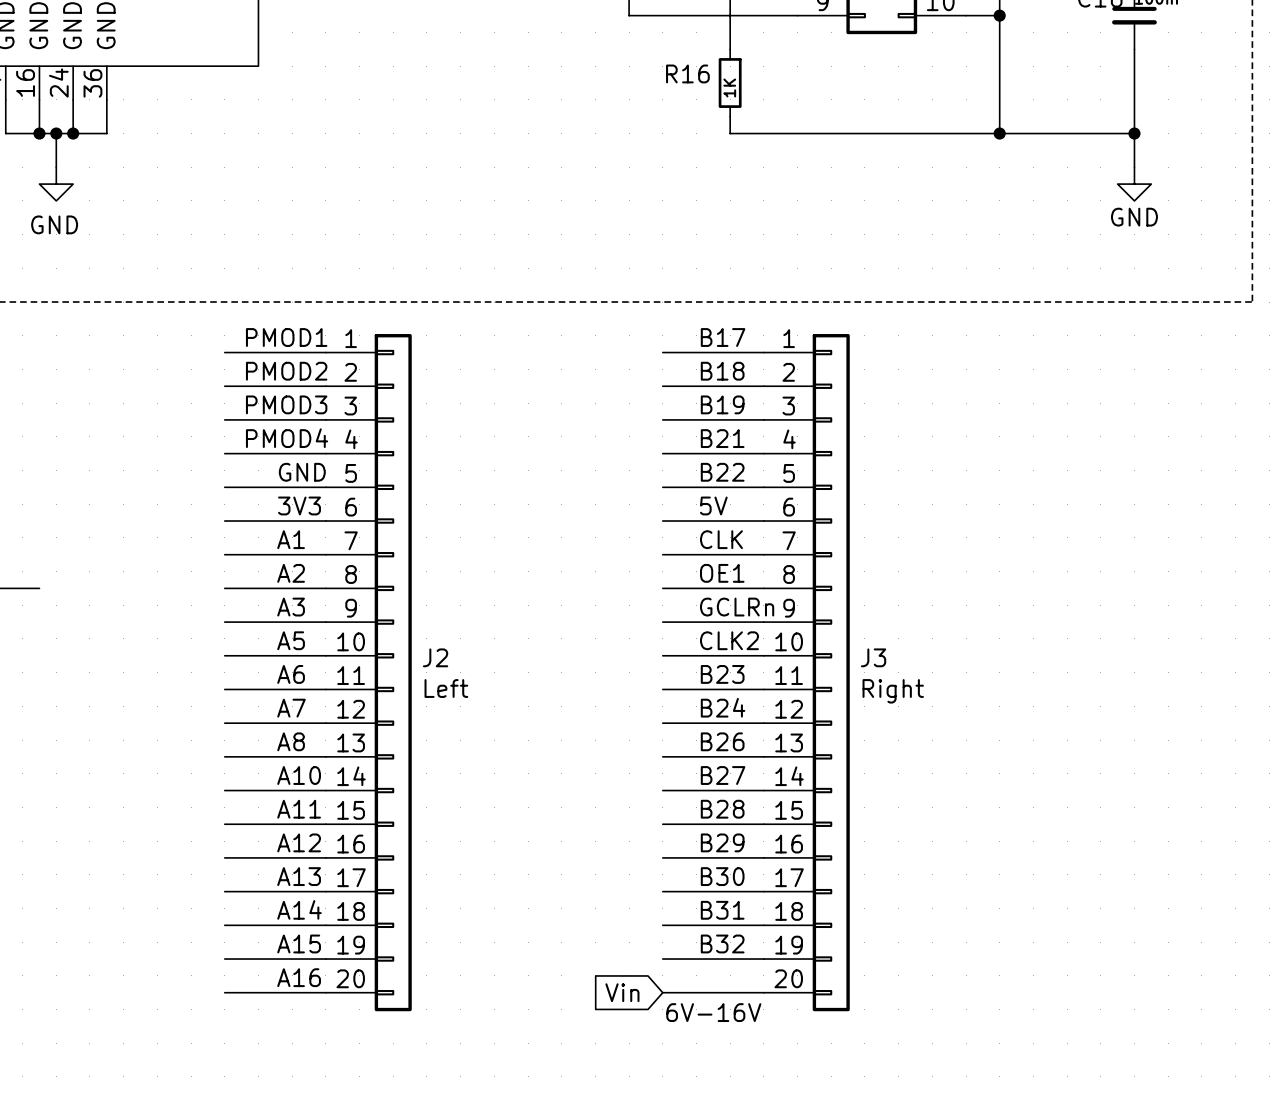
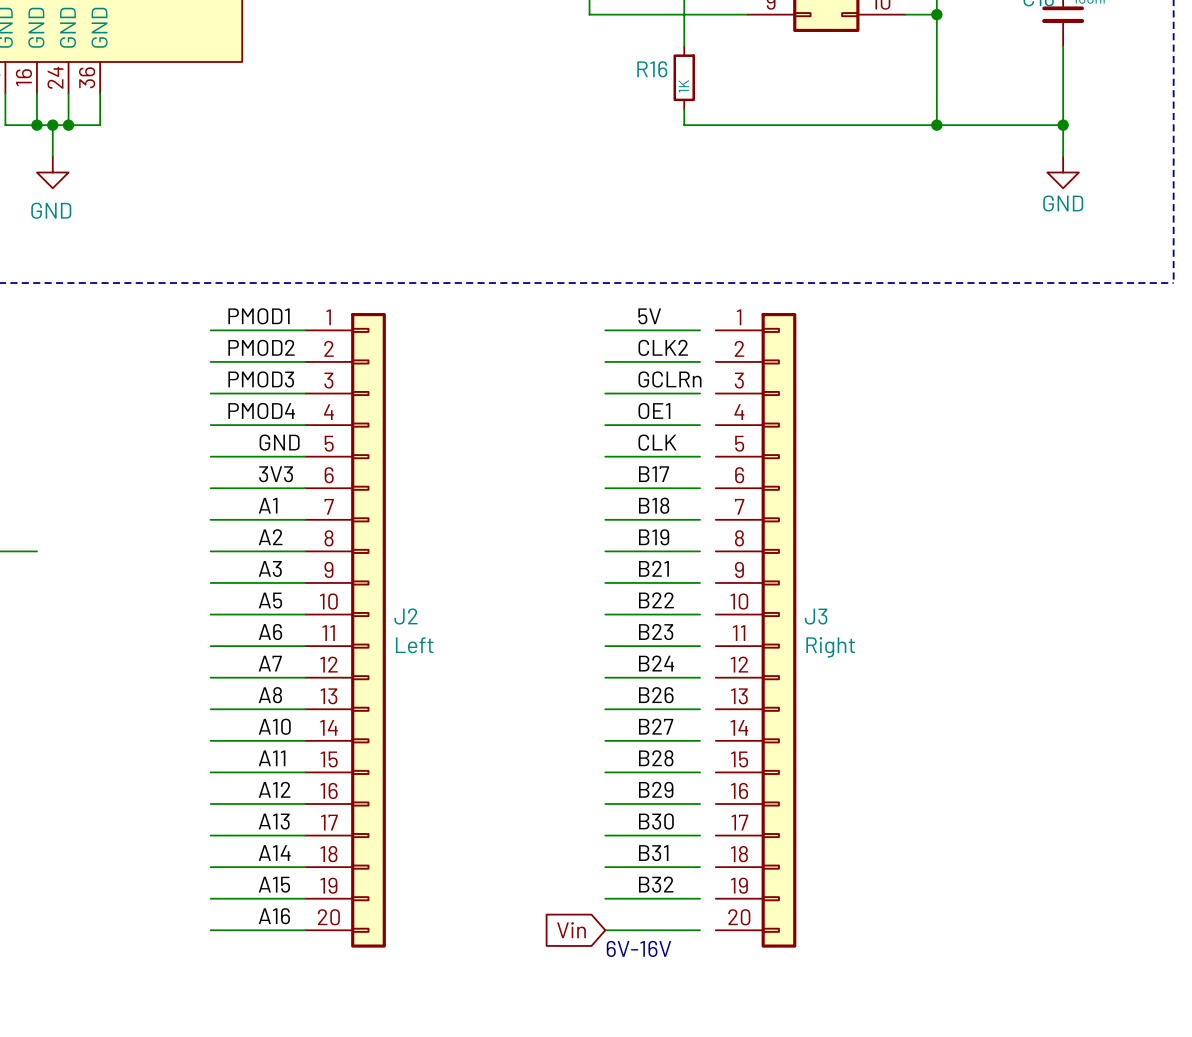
label position: B17 (723, 337) -> B17 (654, 474)
wire: (747, 352) (763, 352) -> (605, 330) (621, 330)
label position: B18 (722, 371) -> B18 (654, 505)
wire: (747, 386) (763, 386) -> (605, 361) (621, 361)
label position: B19 (722, 404) -> B19 (654, 537)
wire: (747, 419) (763, 419) -> (605, 393) (621, 393)
label position: B21 (722, 438) -> B21 (653, 568)
wire: (747, 453) (763, 453) -> (605, 425) (621, 425)
label position: B22 (722, 472) -> B22 (656, 600)
wire: (747, 487) (763, 487) -> (605, 456) (621, 456)
label position: 5V (713, 505) -> 5V (649, 316)
wire: (747, 521) (763, 521) -> (605, 488) (621, 488)
label position: CLK (721, 539) -> CLK (657, 442)
wire: (747, 554) (763, 554) -> (605, 519) (621, 519)
label position: OE1 (722, 573) -> OE1 (654, 411)
wire: (747, 588) (763, 588) -> (605, 551) (621, 551)
label position: GCLRn (737, 607) -> GCLRn (670, 379)
wire: (747, 622) (763, 622) -> (605, 582) (621, 582)
label position: CLK2 (729, 640) -> CLK2 (663, 347)
wire: (747, 655) (763, 655) -> (605, 614) (621, 614)
label position: B23 (722, 674) -> B23 (656, 632)
wire: (747, 689) (763, 689) -> (605, 646) (621, 646)
label position: B24 (723, 707) -> B24 (656, 663)
wire: (747, 723) (763, 723) -> (605, 677) (621, 677)
label position: B26 (722, 741) -> B26 (656, 695)
wire: (747, 756) (763, 756) -> (605, 709) (621, 709)
label position: B27 (723, 775) -> B27 (656, 726)
wire: (747, 790) (763, 790) -> (605, 740) (621, 740)
label position: B28 (722, 809) -> B28 (656, 758)
wire: (747, 824) (763, 824) -> (605, 772) (621, 772)
label position: B29 (722, 842) -> B29 (656, 789)
wire: (747, 857) (763, 857) -> (605, 803) (621, 803)
label position: B30 (722, 876) -> B30 (656, 821)
wire: (747, 891) (763, 891) -> (605, 835) (621, 835)
label position: B31 (722, 910) -> B31 (653, 853)
wire: (747, 925) (763, 925) -> (605, 867) (621, 867)
label position: B32 (722, 943) -> B32 (656, 884)
wire: (747, 959) (763, 959) -> (605, 898) (621, 898)
global label position: Vin (622, 992) -> Vin (571, 930)
wire: (747, 992) (763, 992) -> (605, 930) (621, 930)
text position: 6V-16V (713, 1012) -> 6V-16V (638, 948)

